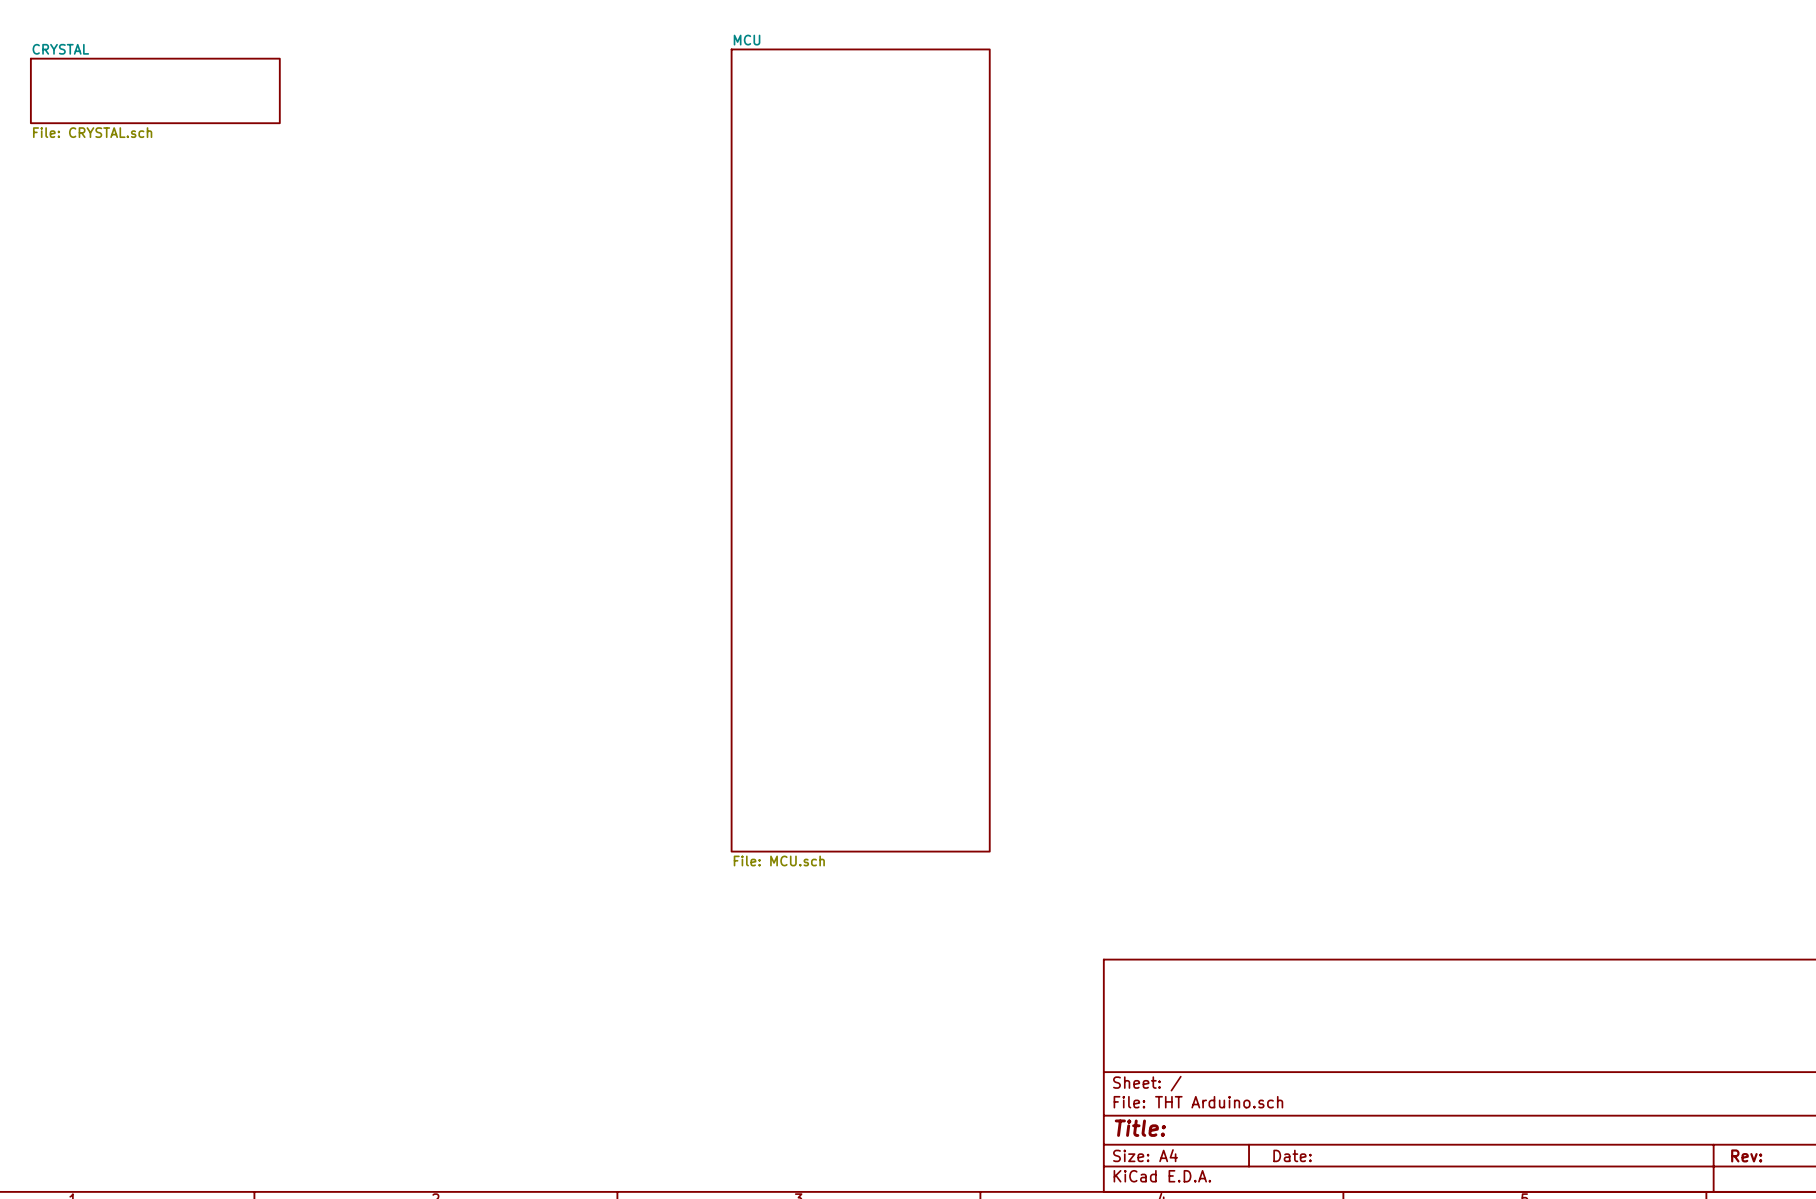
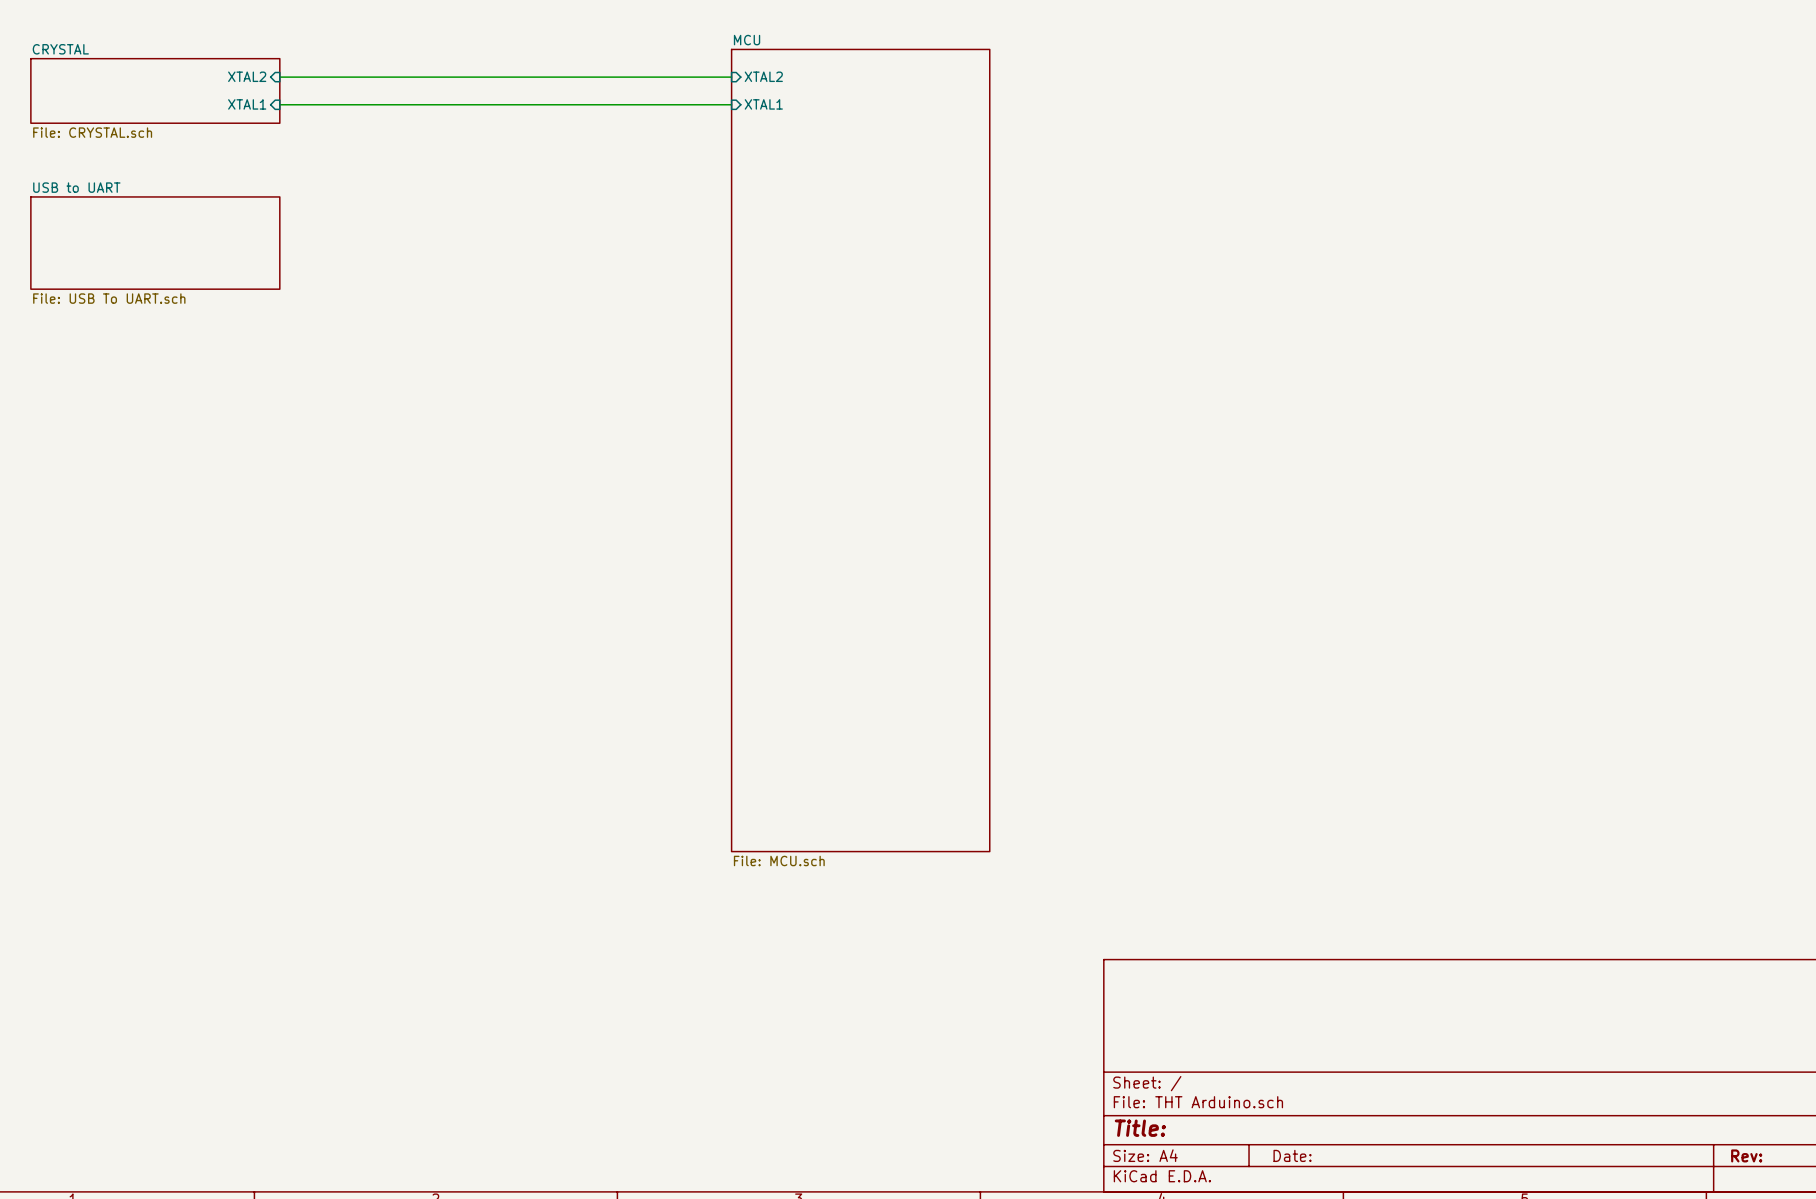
sheet pin: none -> XTAL2 (247, 76)
sheet pin: none -> XTAL2 (763, 76)
wire: none -> (279, 77) (731, 77)
sheet pin: none -> XTAL1 (247, 104)
wire: none -> (279, 104) (731, 104)
sheet pin: none -> XTAL1 (763, 104)
sheet USB to UART: none -> File: USB To UART.sch (155, 243)

